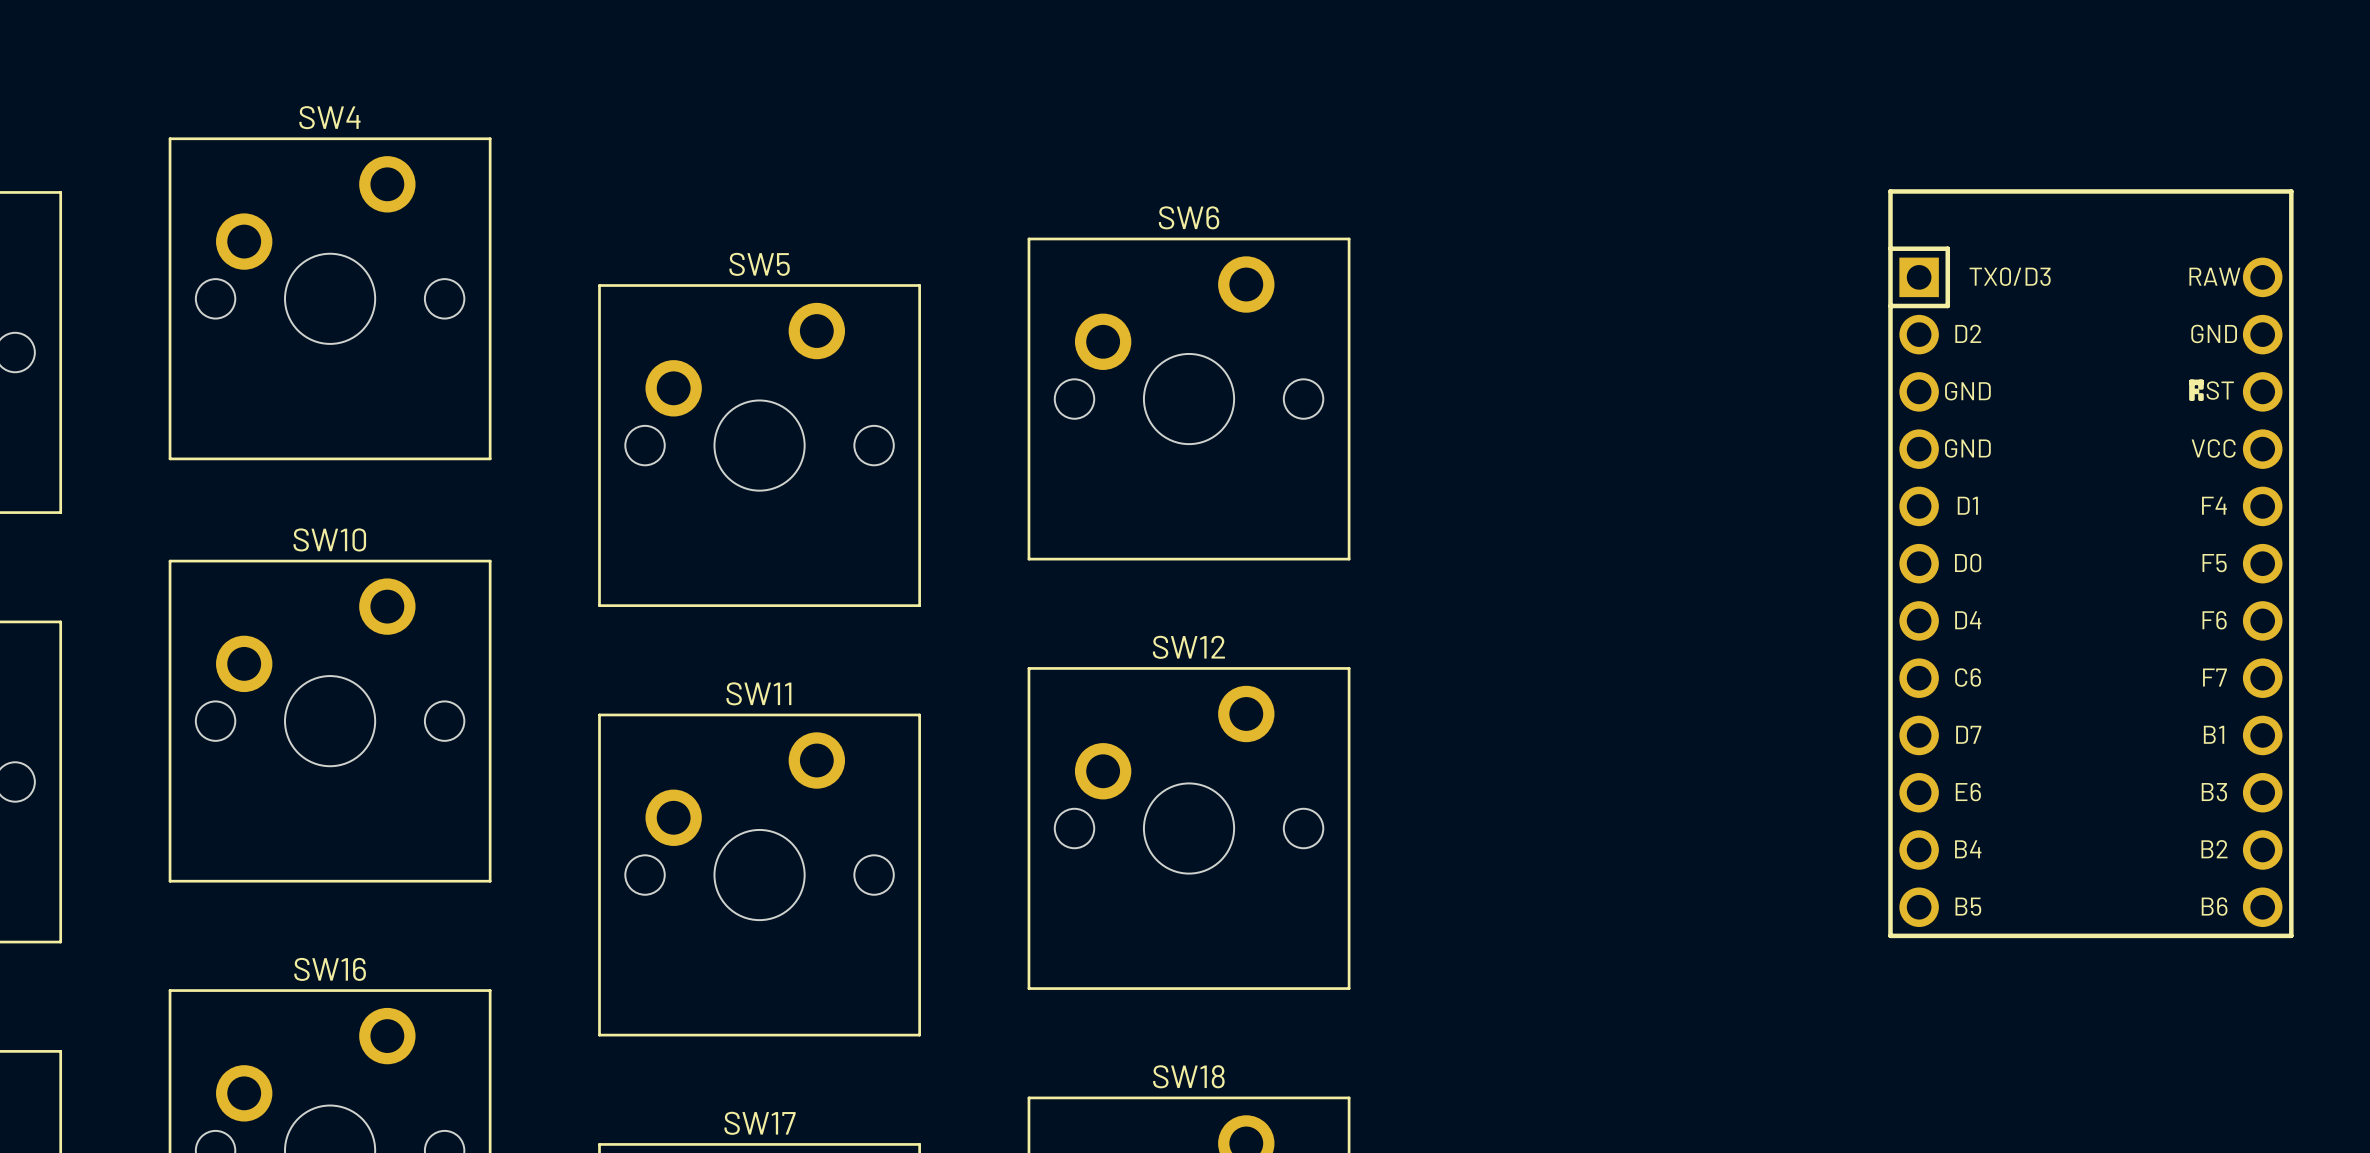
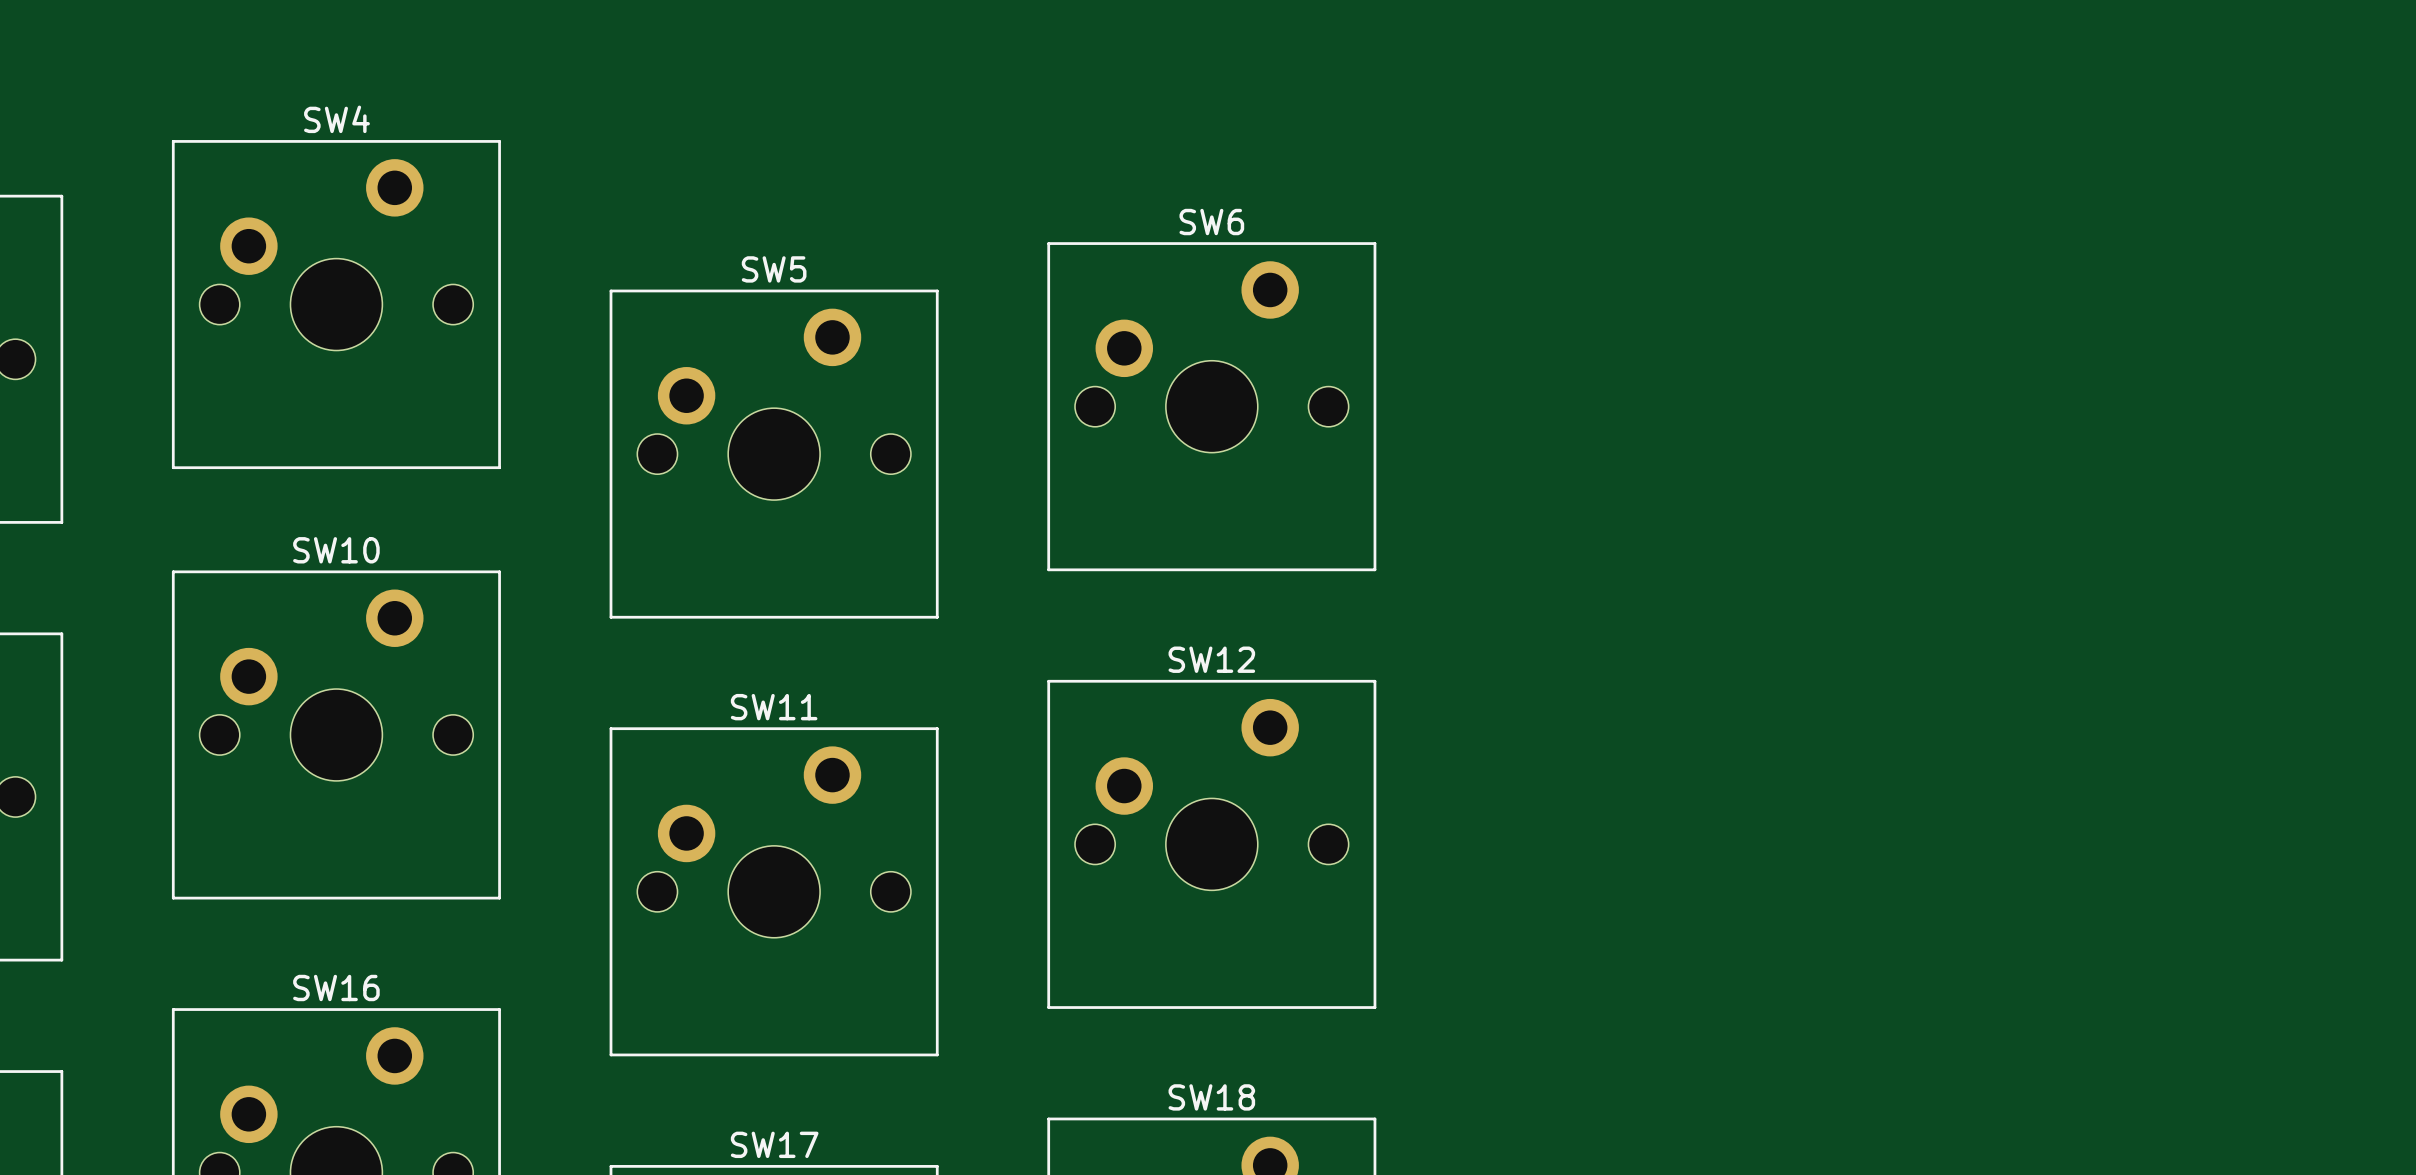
part: (2090, 563) -> none

